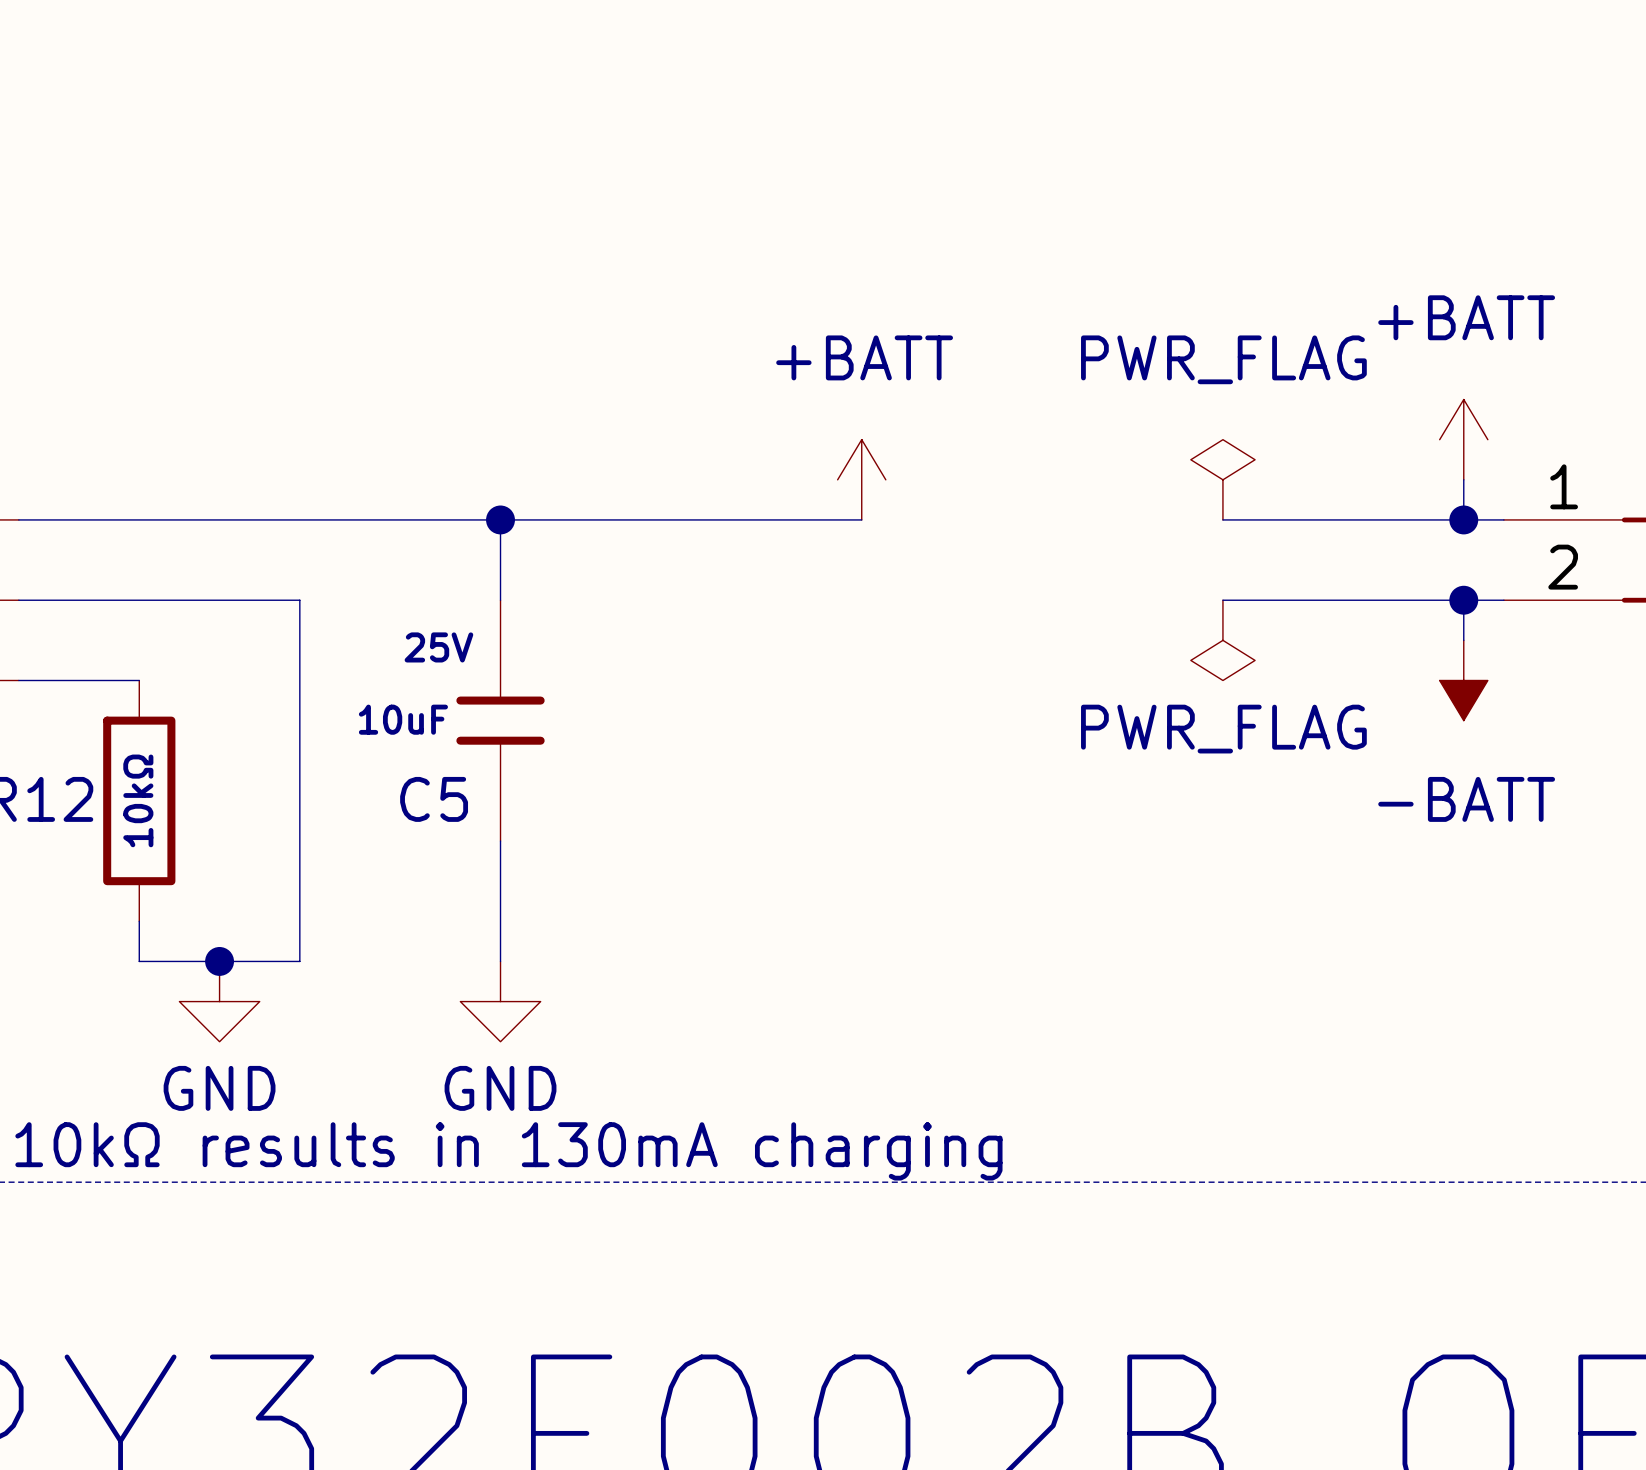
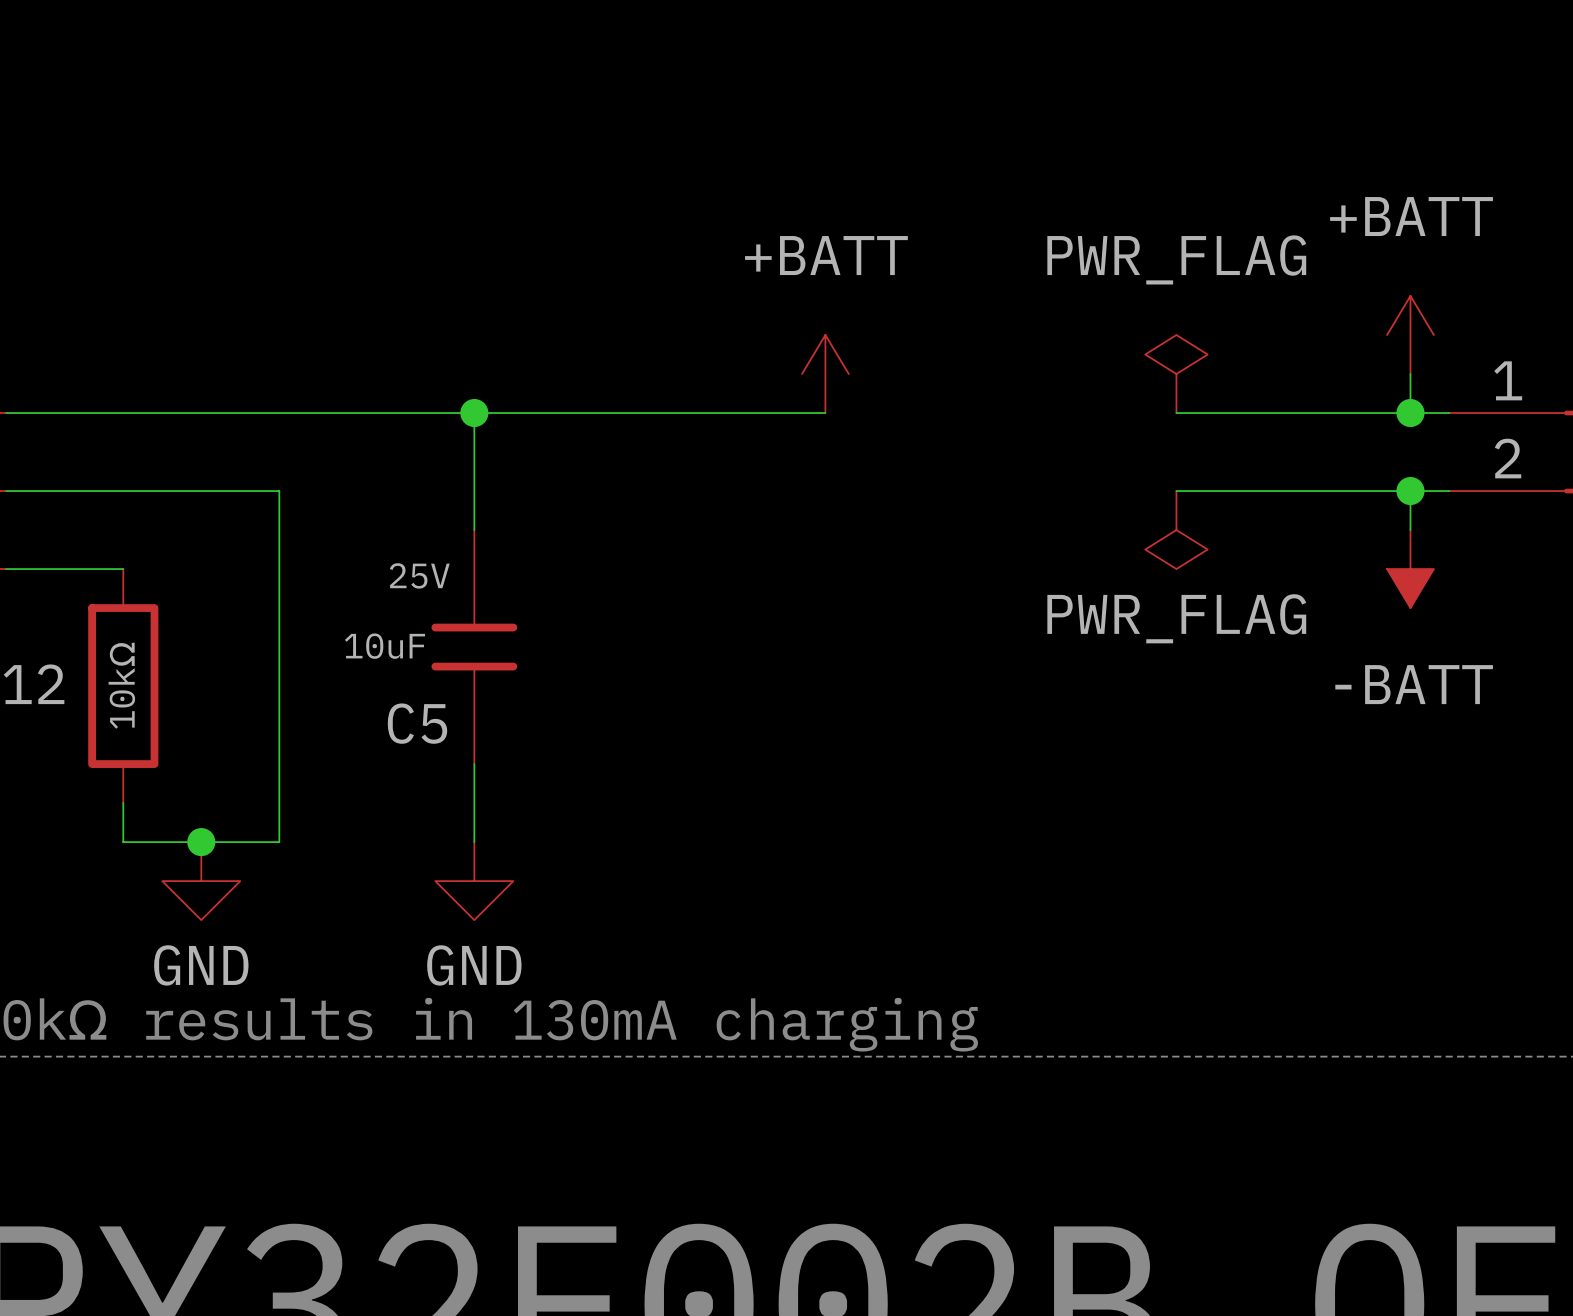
C5 position: (500, 720) -> (474, 647)

